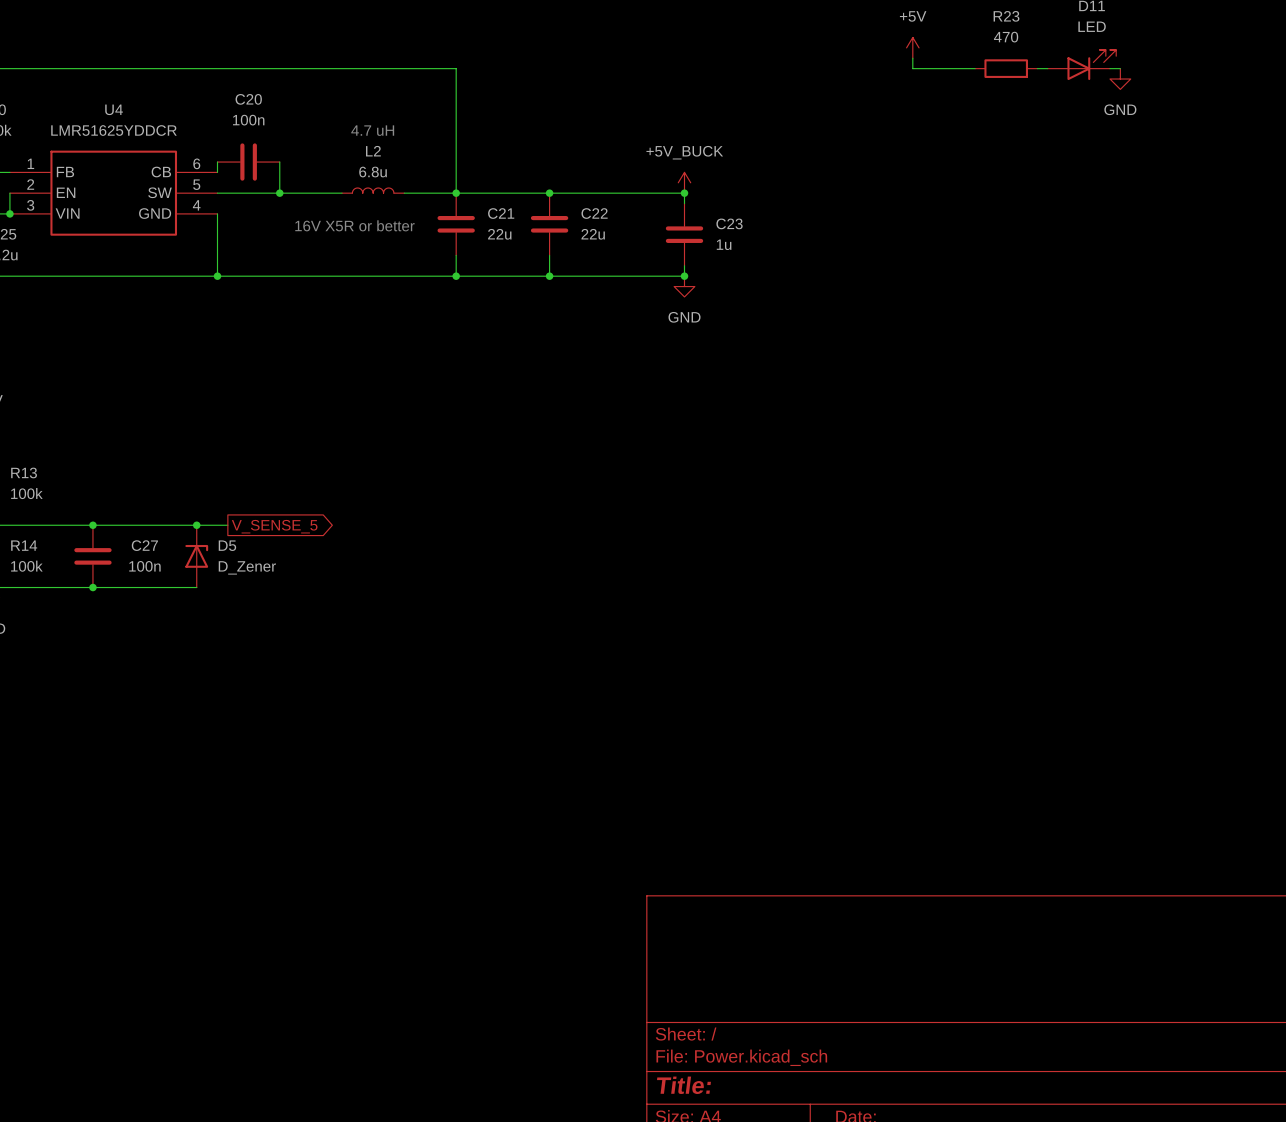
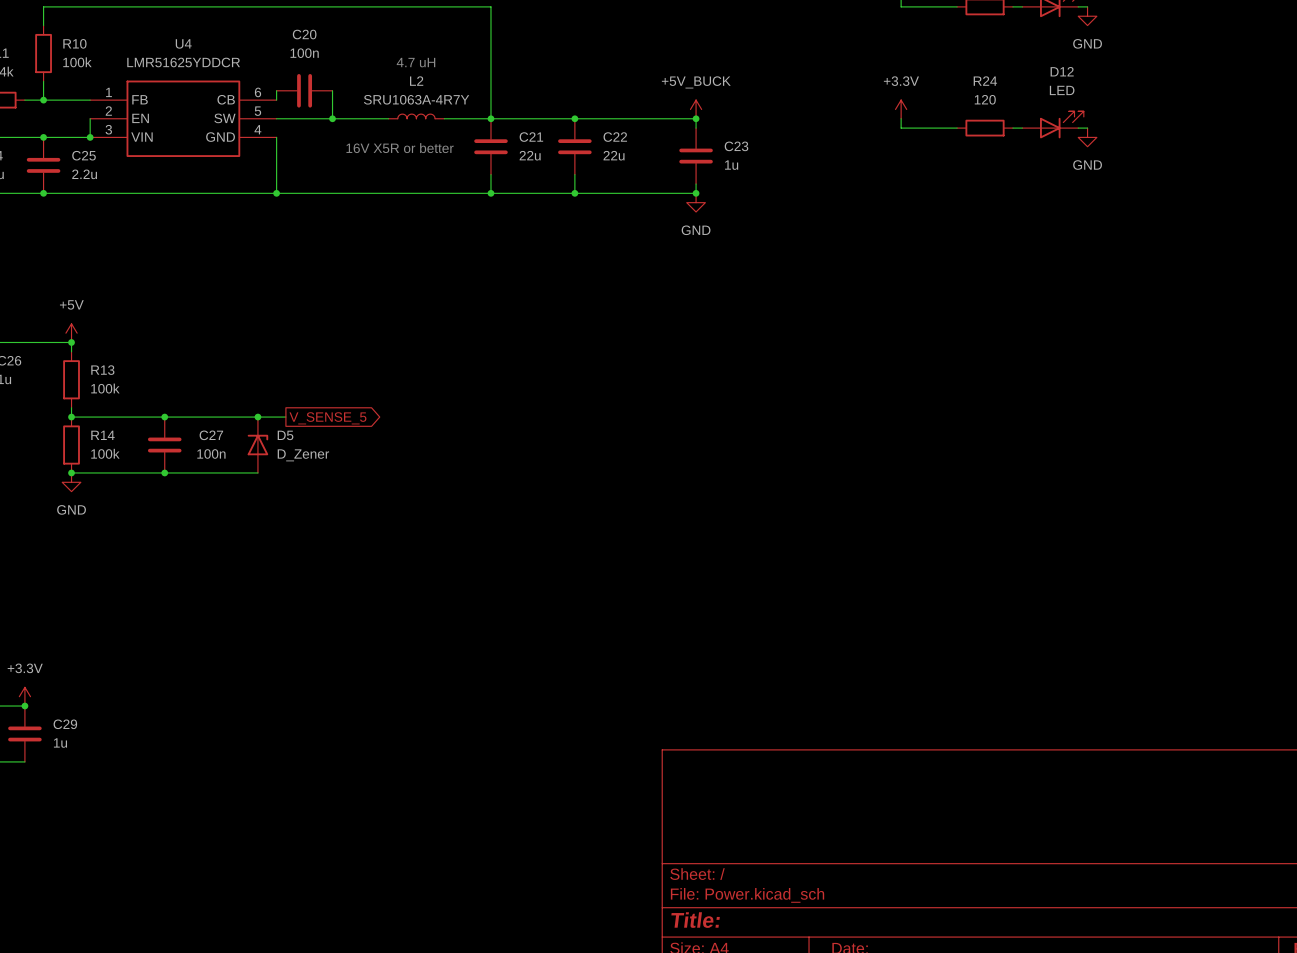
L2 value: 6.8u (373, 172) -> SRU1063A-4R7Y (416, 99)
power symbol: none -> +3.3V (901, 109)
wire: none -> (901, 118) (901, 128) (957, 128)
D12: none -> LED (1053, 124)
R24: none -> 120 (985, 128)
wire: none -> (1012, 128) (1022, 128)
wire: none -> (1078, 128) (1087, 128)
power symbol: none -> GND (1087, 137)

